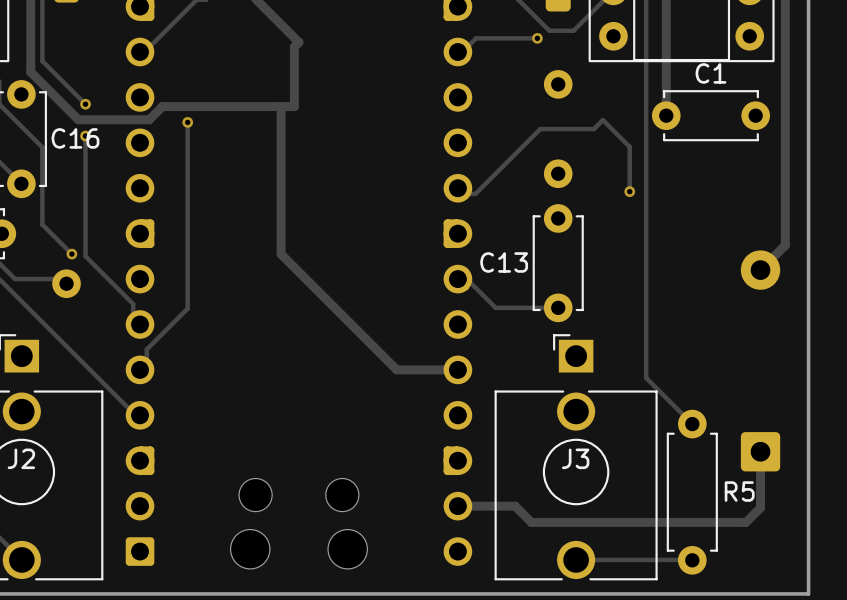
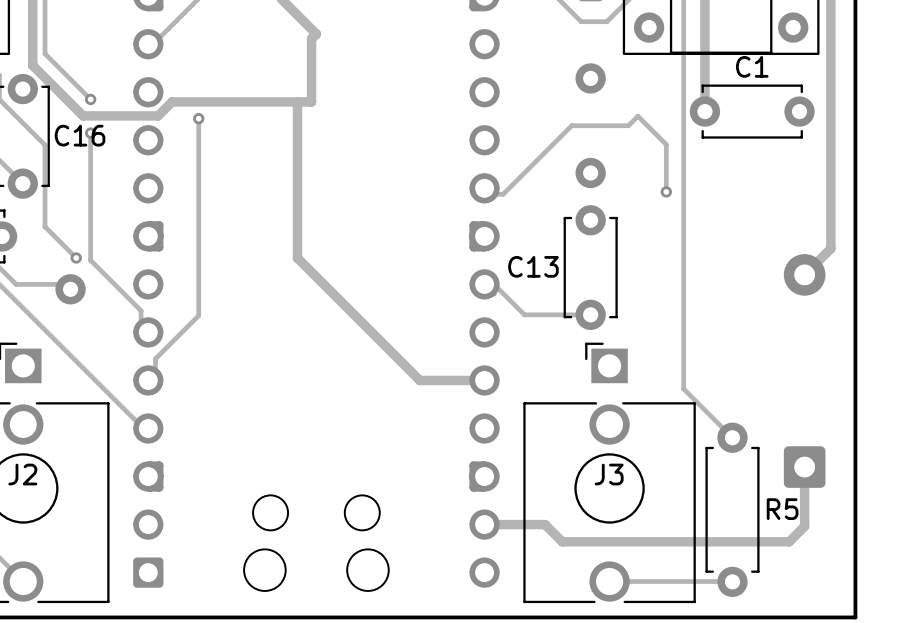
track: (537, 38) (476, 38) (469, 45) -> none
via: (537, 38) -> none

